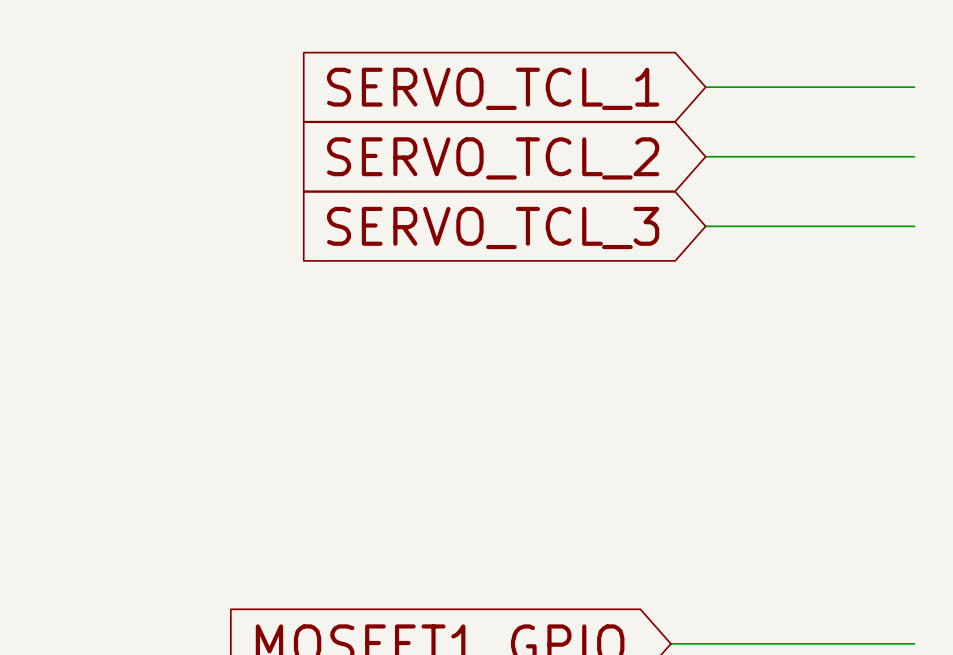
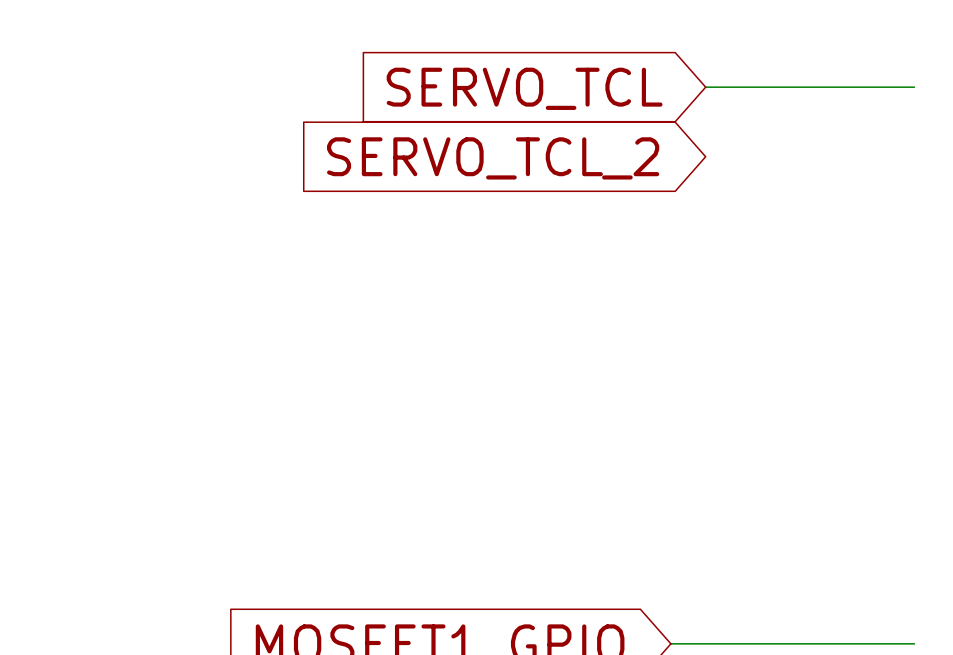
global label: SERVO_TCL_1 (493, 88) -> SERVO_TCL (524, 88)
wire: (705, 156) (914, 156) -> none
wire: (705, 226) (914, 226) -> none
global label: SERVO_TCL_3 (493, 227) -> none

